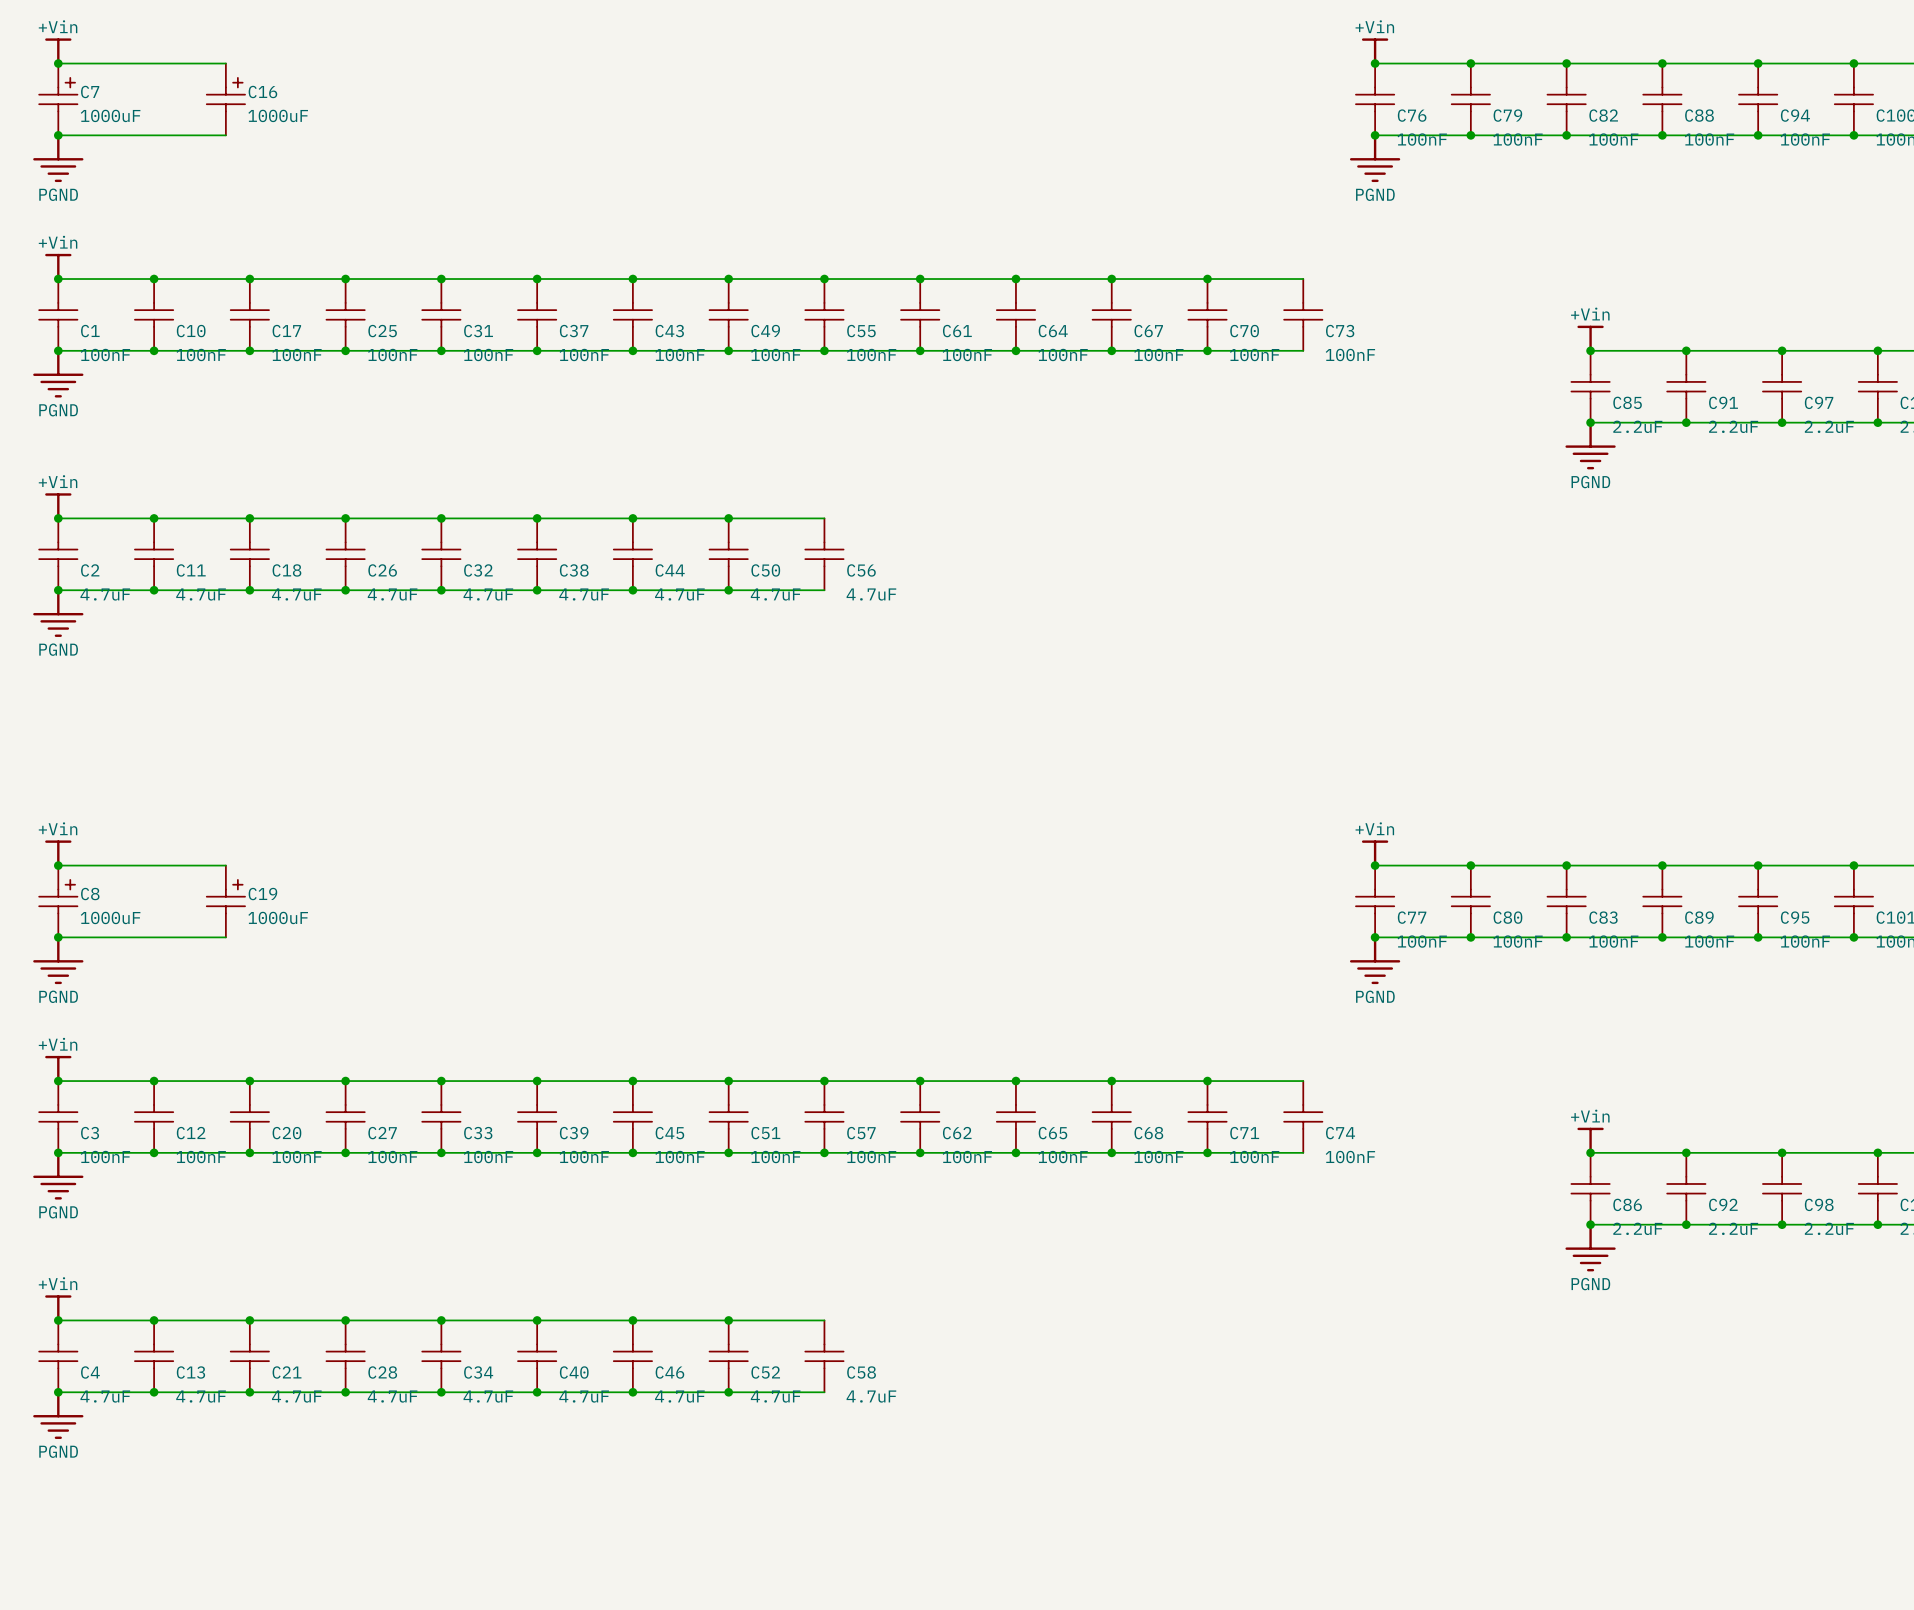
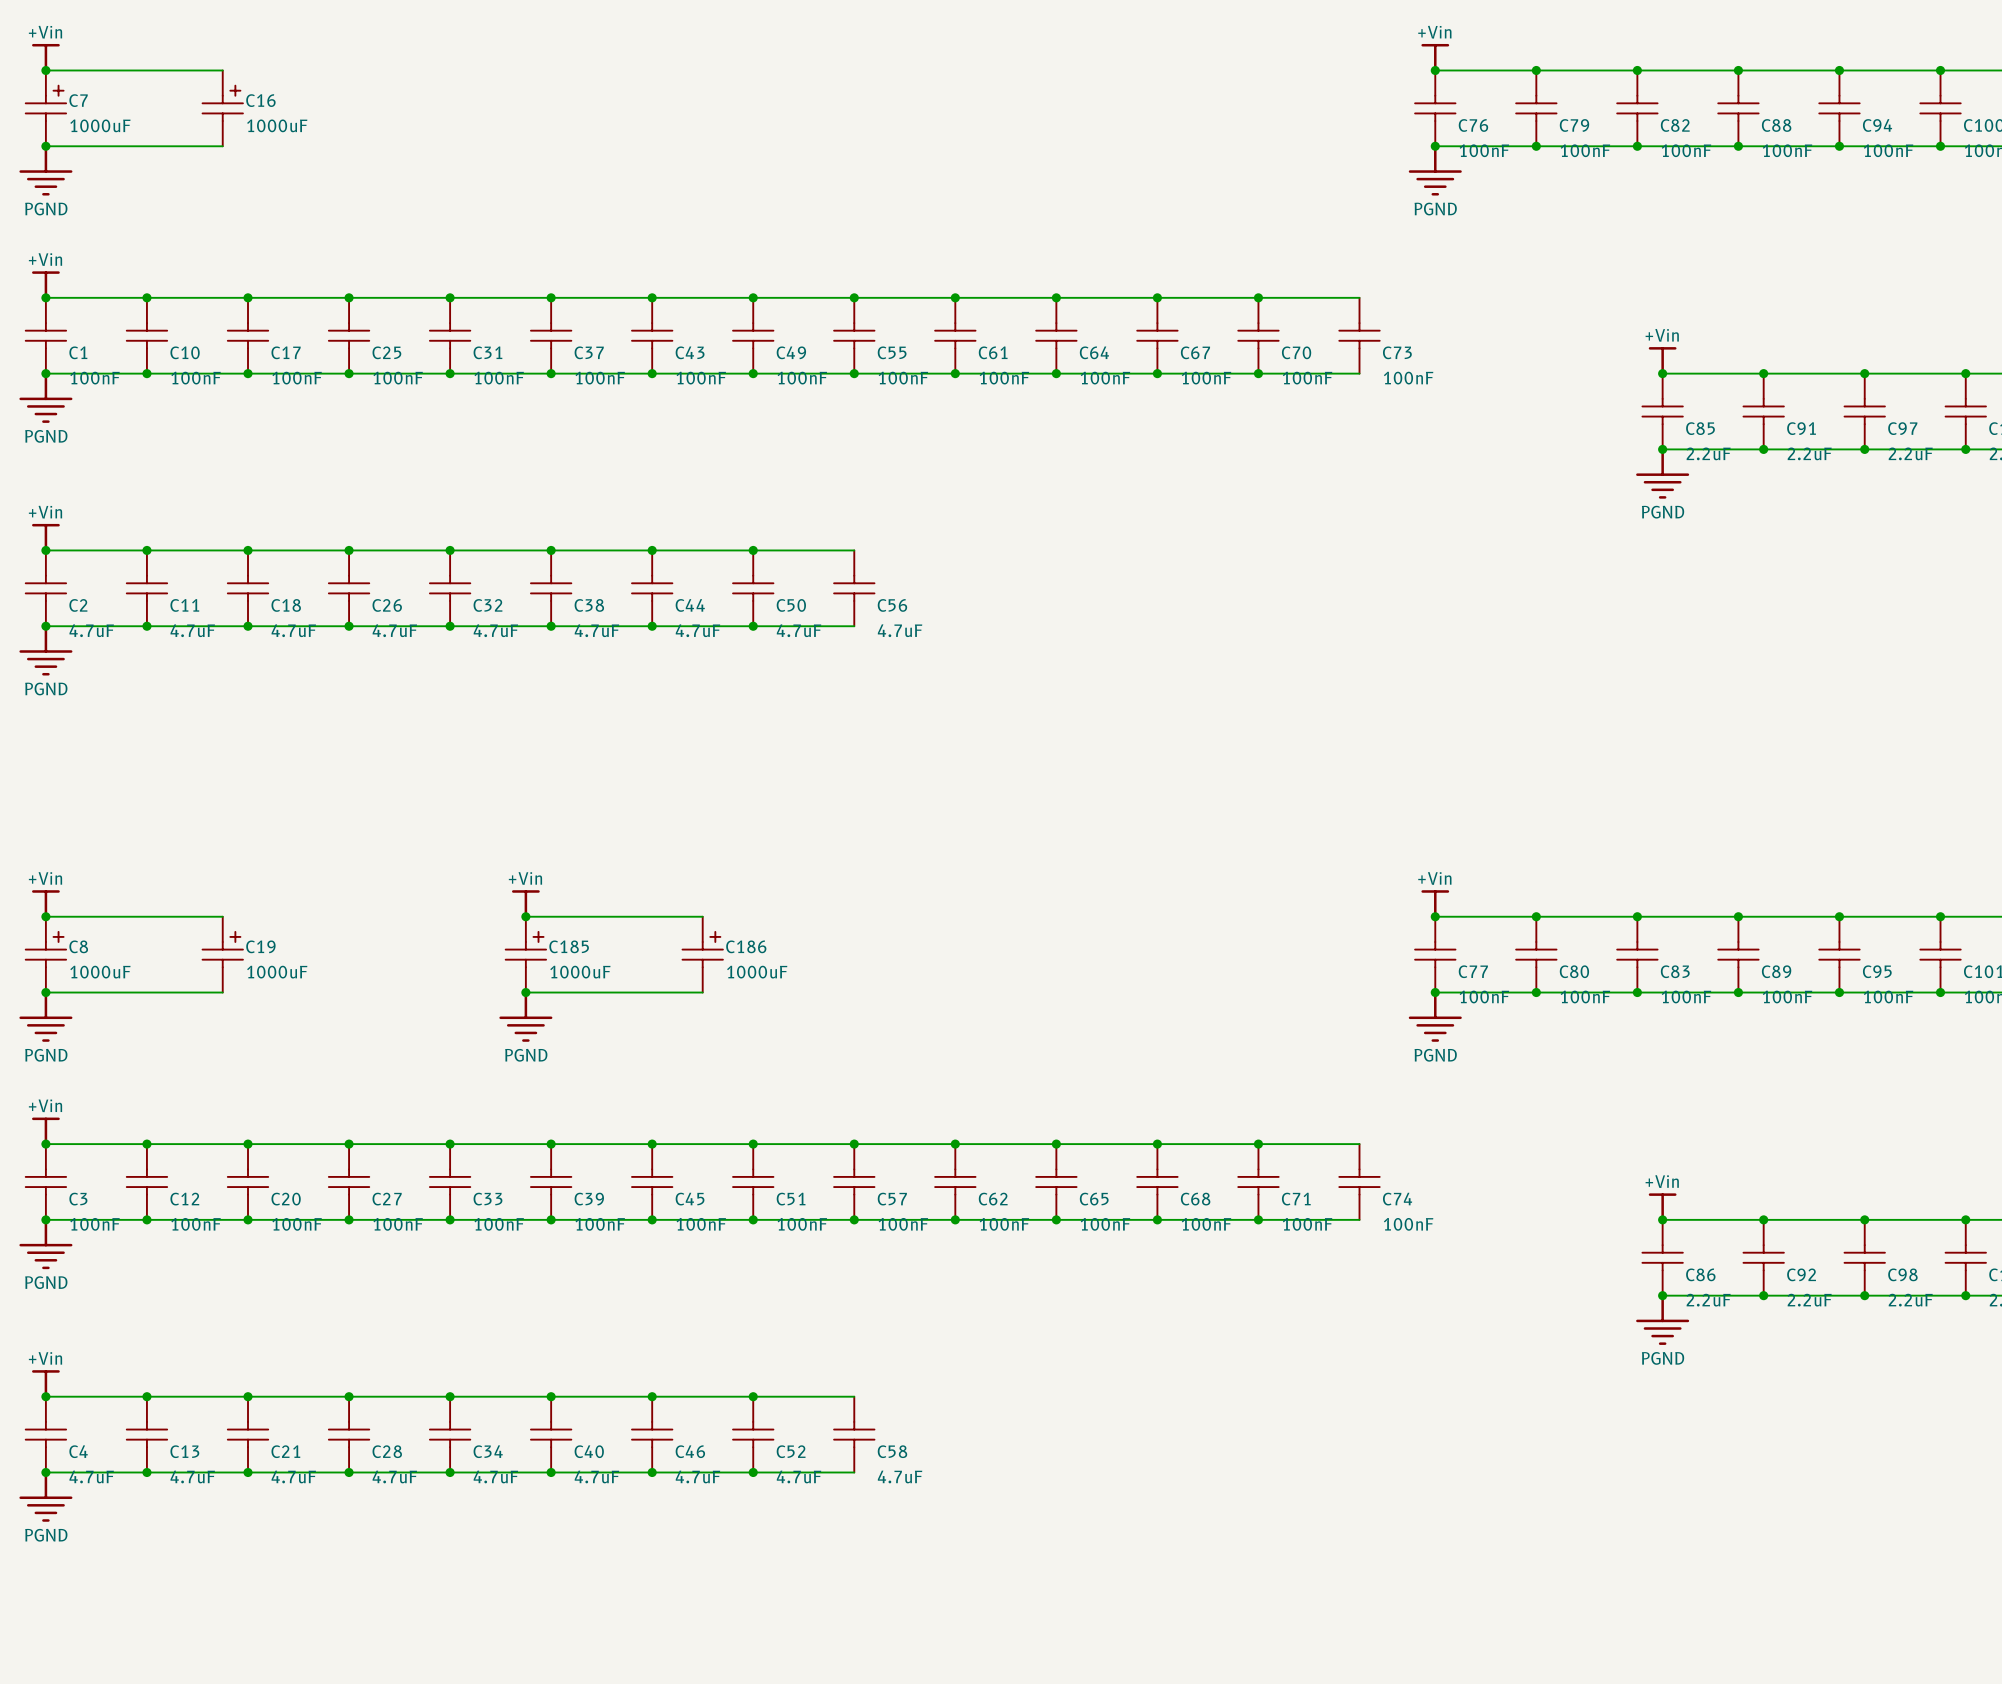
power symbol: none -> +Vin (525, 904)
wire: none -> (525, 916) (702, 916)
junction: none -> (525, 916)
C185: none -> (525, 954)
C186: none -> (702, 954)
wire: none -> (525, 992) (702, 992)
junction: none -> (525, 992)
power symbol: none -> PGND (525, 1016)

